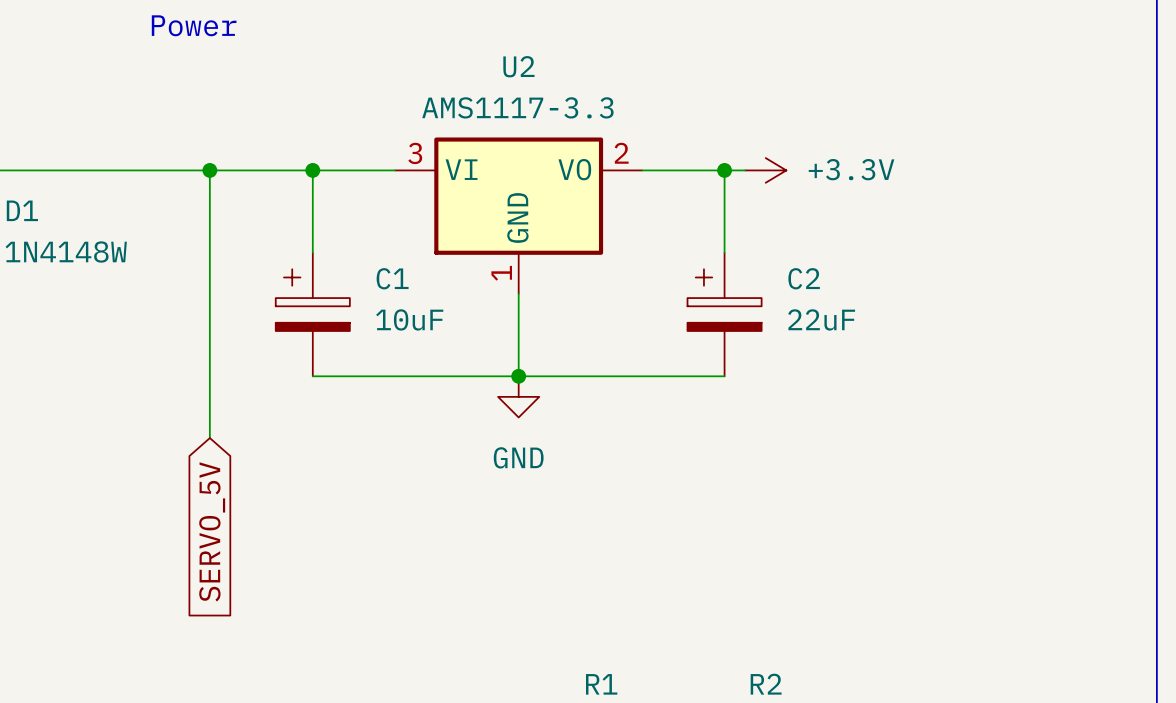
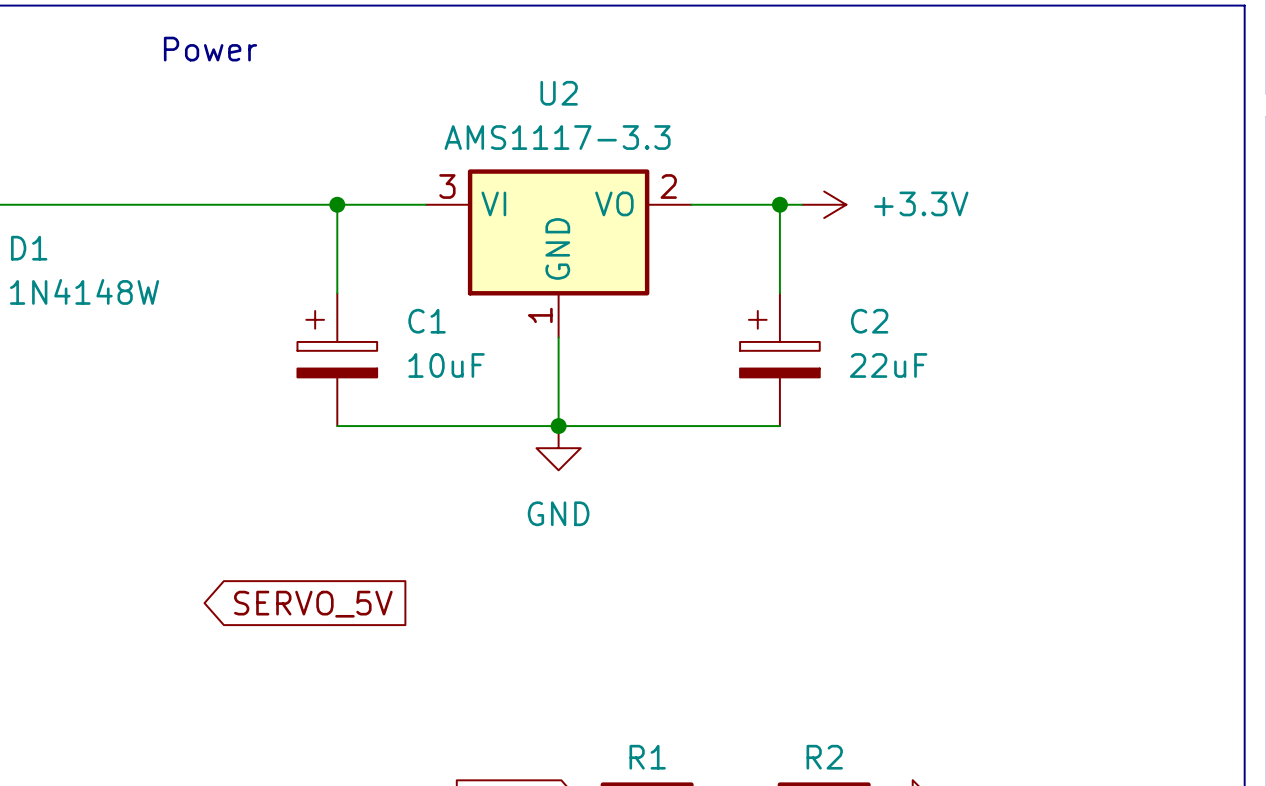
wire: (209, 170) (209, 438) -> none
junction: (209, 170) -> none
global label rotation: 0° (212, 531) -> 90° counterclockwise (313, 604)

